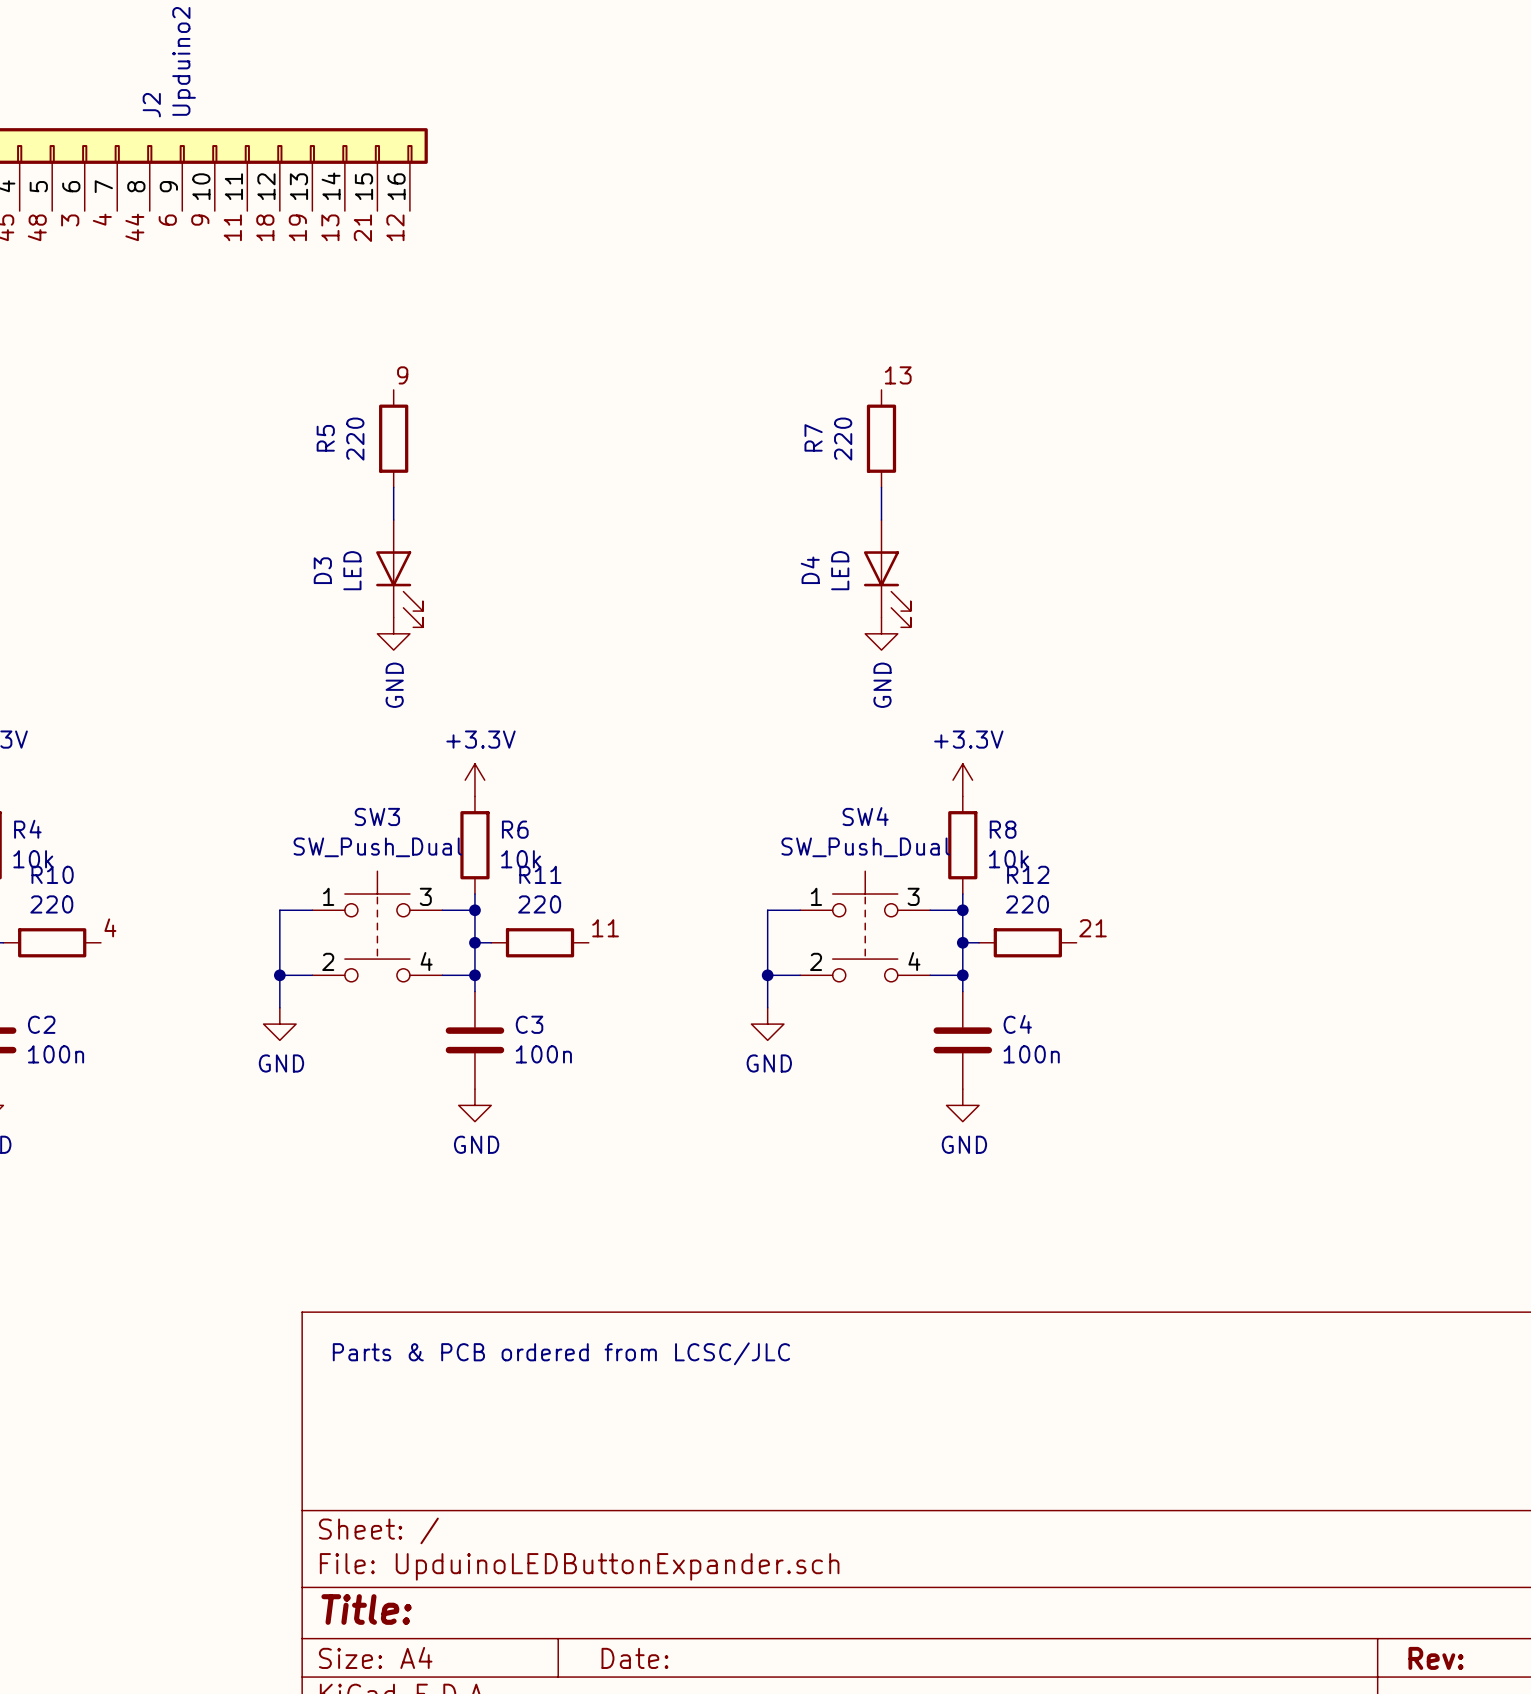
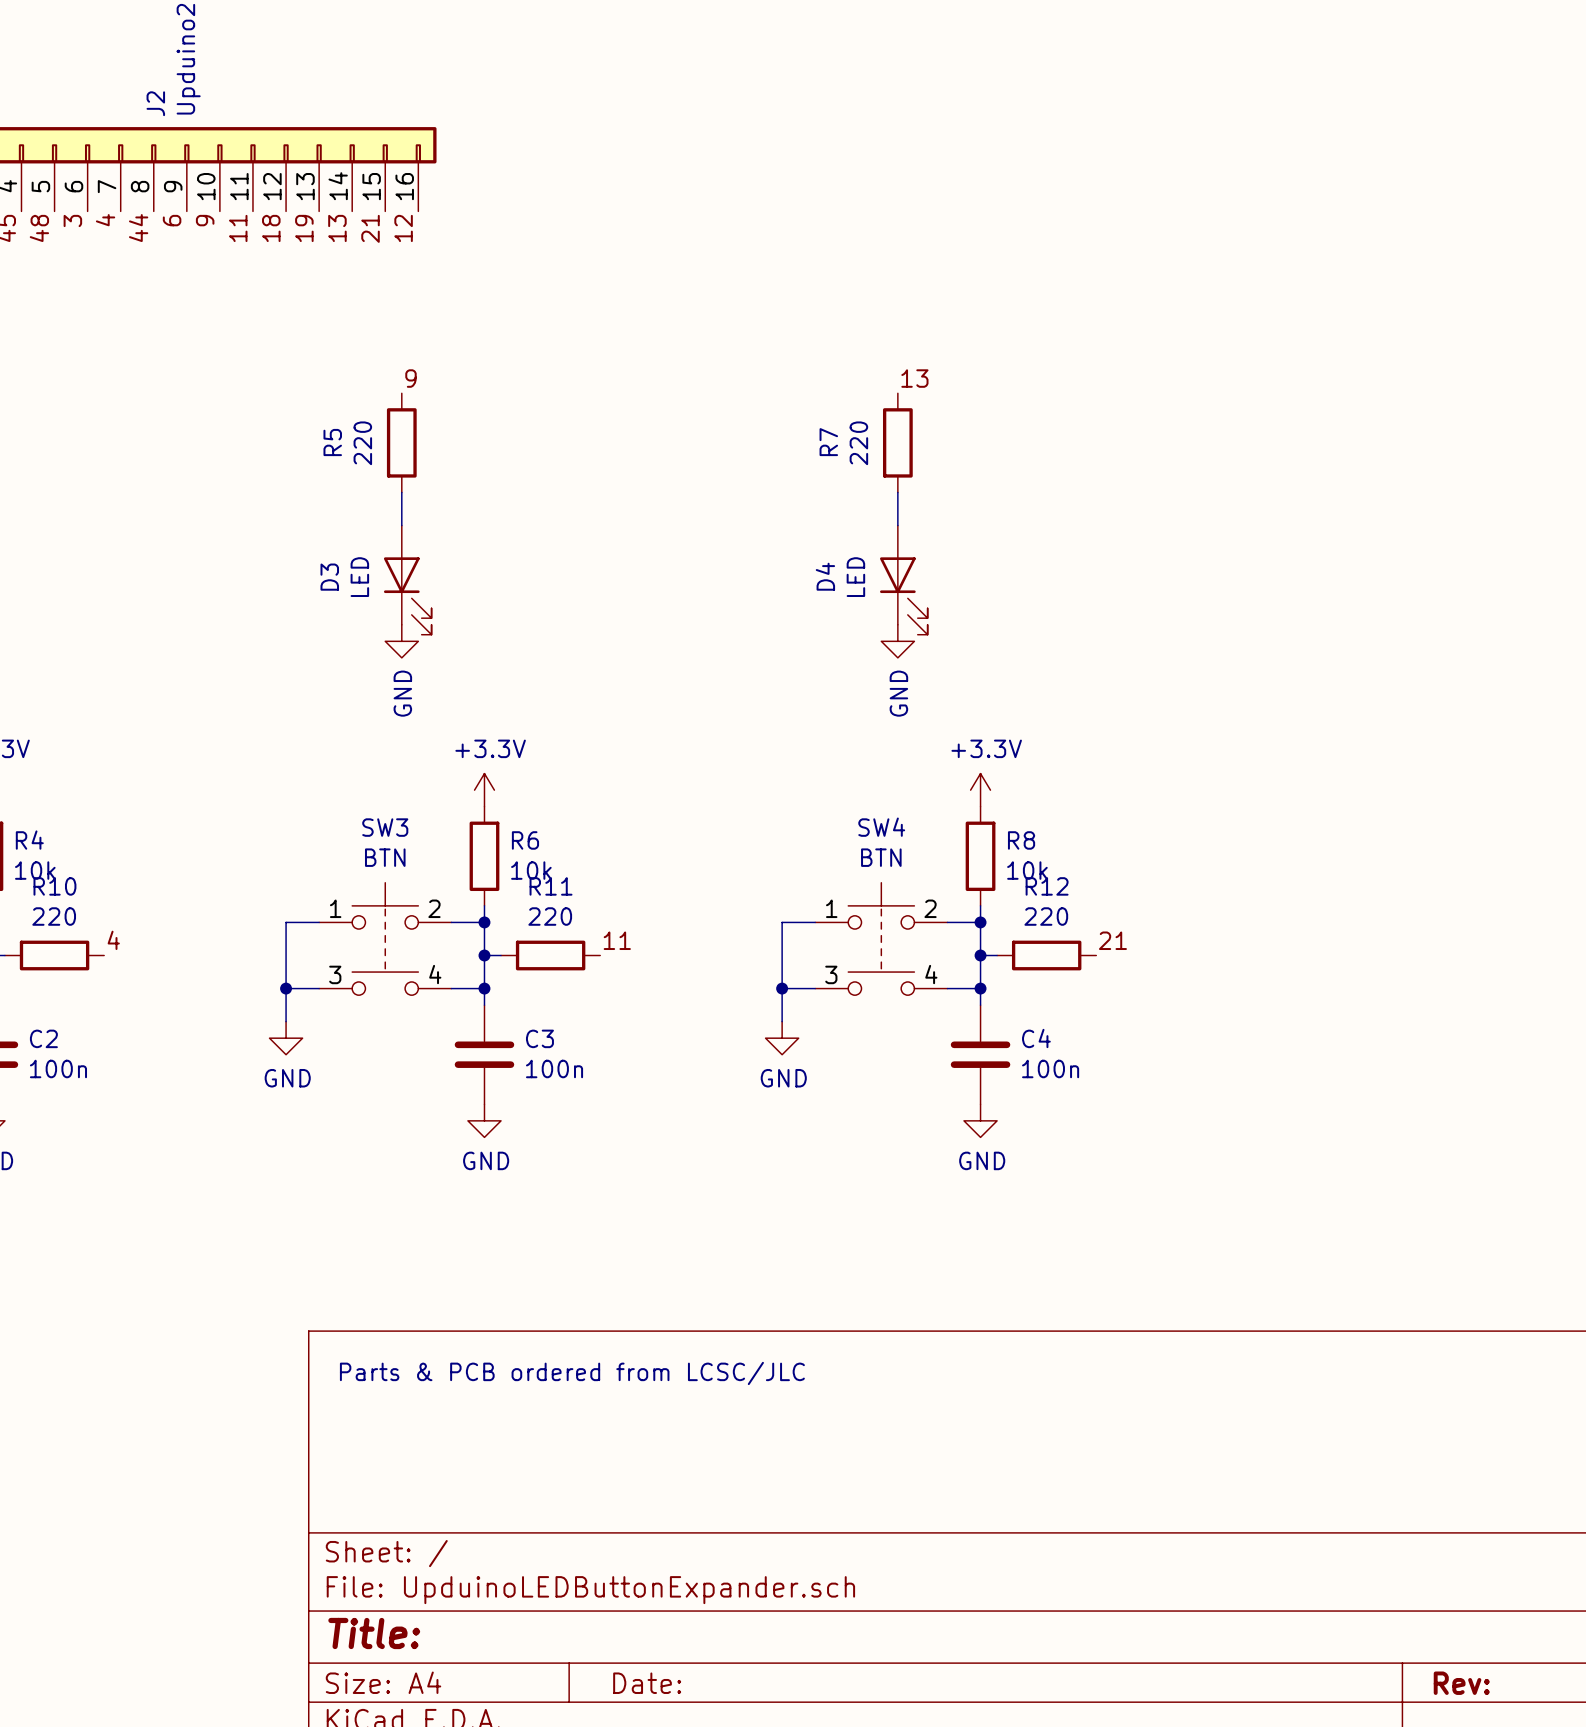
SW3 value: SW_Push_Dual (377, 847) -> BTN (385, 857)
SW4 value: SW_Push_Dual (865, 847) -> BTN (881, 857)
SW3 pin number: 3 (425, 896) -> 2 (434, 908)
SW4 pin number: 3 (913, 896) -> 2 (930, 908)
SW3 pin number: 2 (328, 961) -> 3 (335, 974)
SW4 pin number: 2 (816, 961) -> 3 (831, 974)

